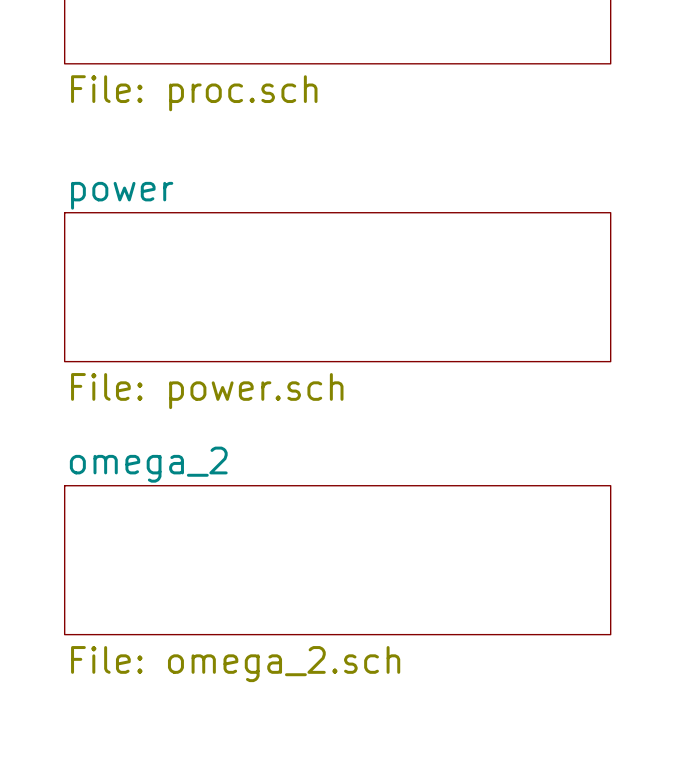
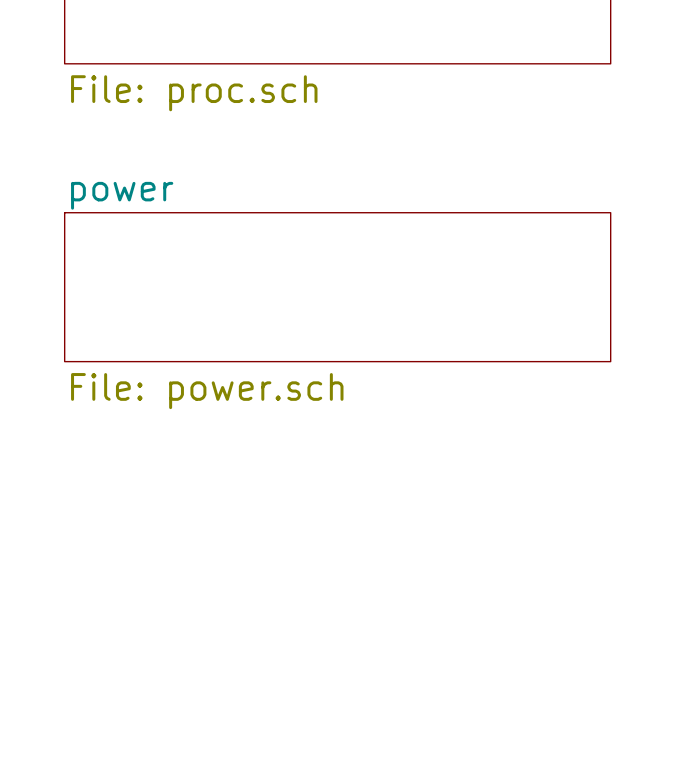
sheet omega_2: File: omega_2.sch (337, 560) -> none

